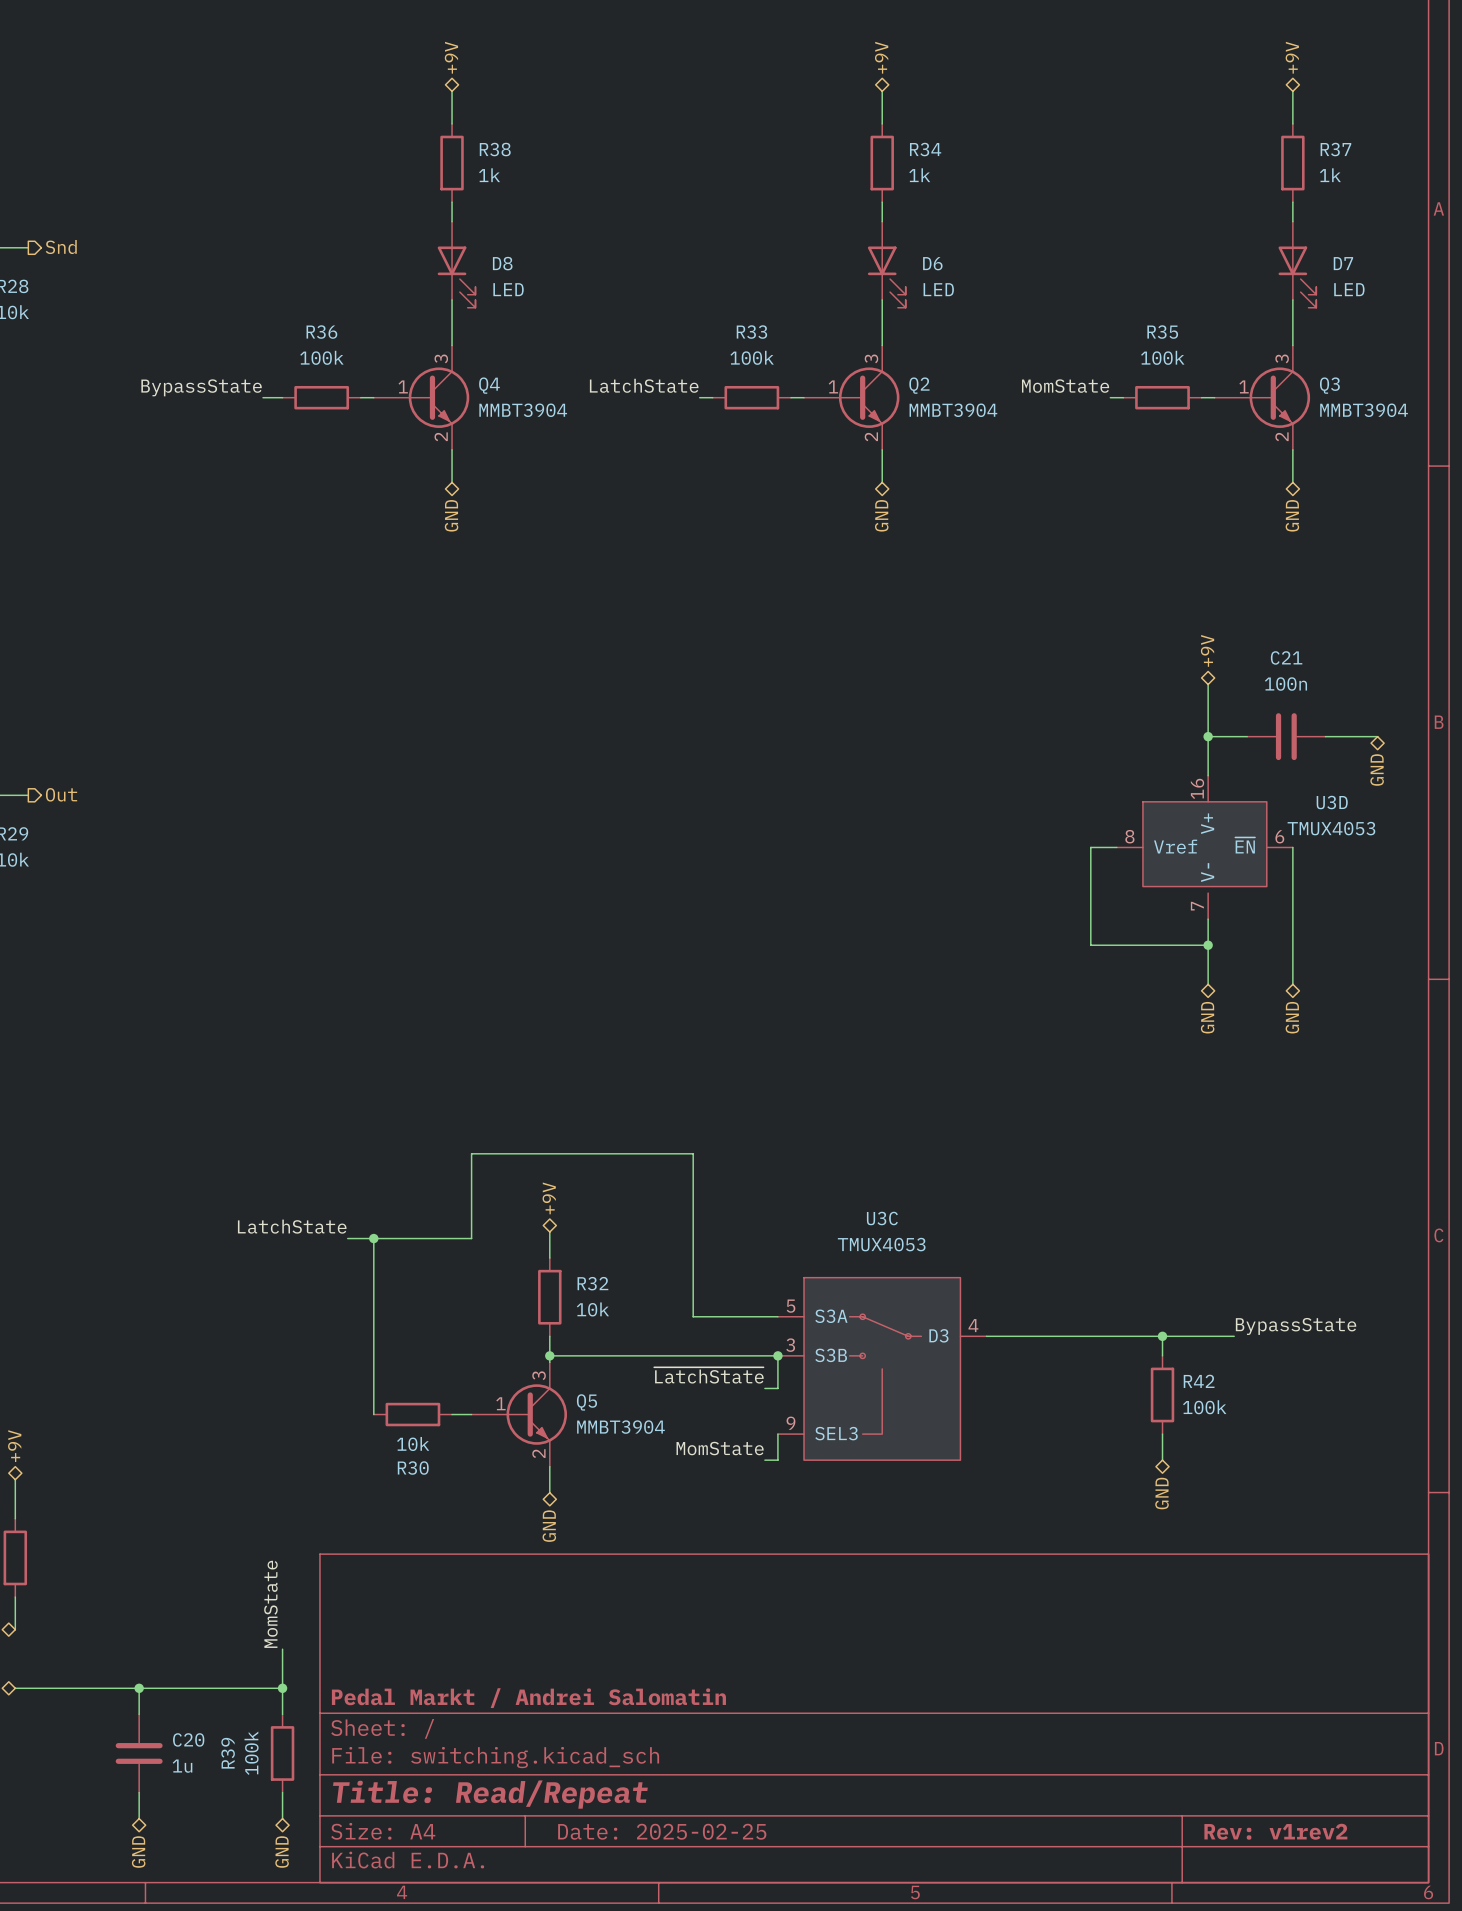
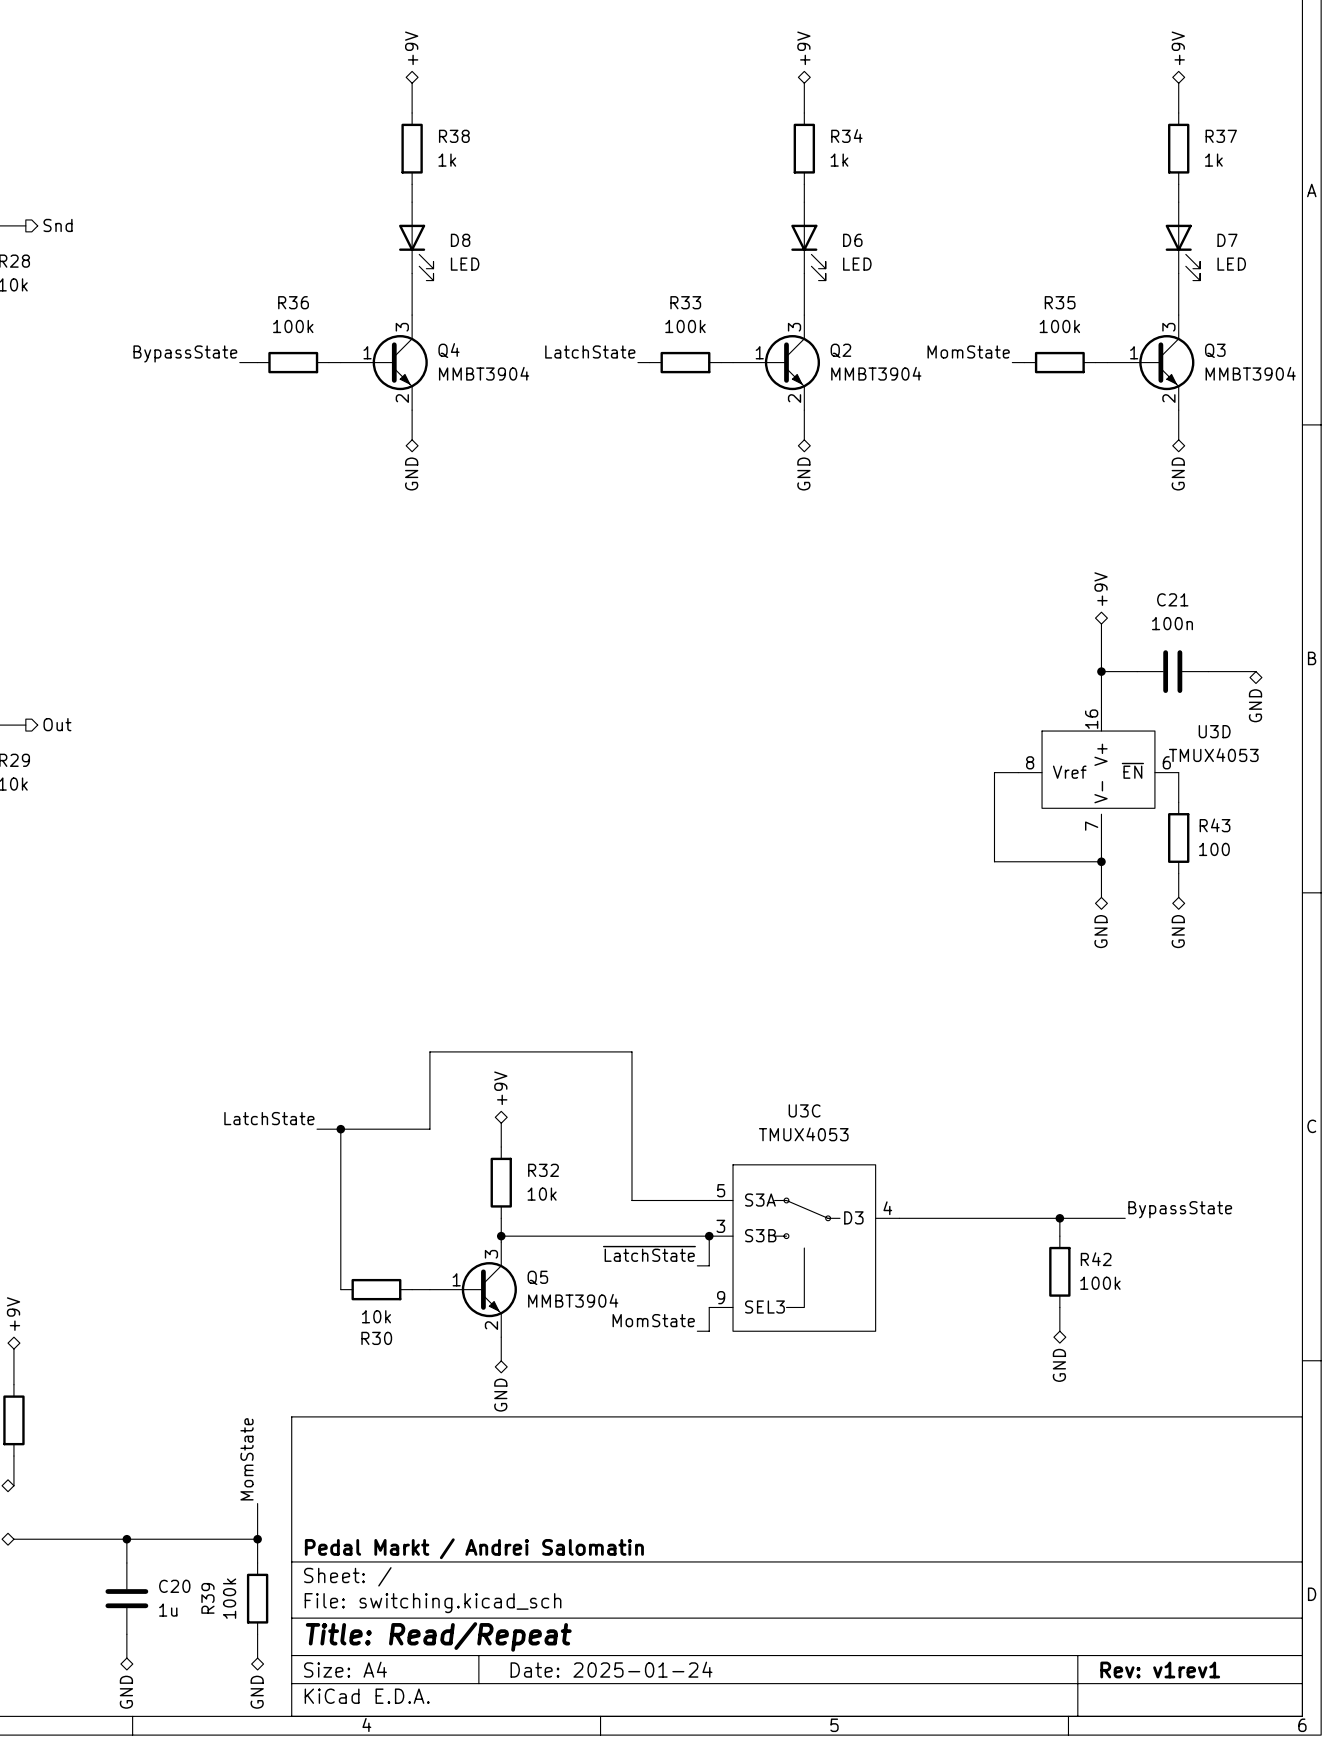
wire: (1292, 880) (1292, 958) -> none
R43: none -> 100 (1178, 838)
title block: Date: 2025-02-25 (662, 1831) -> Date: 2025-01-24 (611, 1669)
title block: Rev: v1rev2 (1275, 1831) -> Rev: v1rev1 (1160, 1670)

